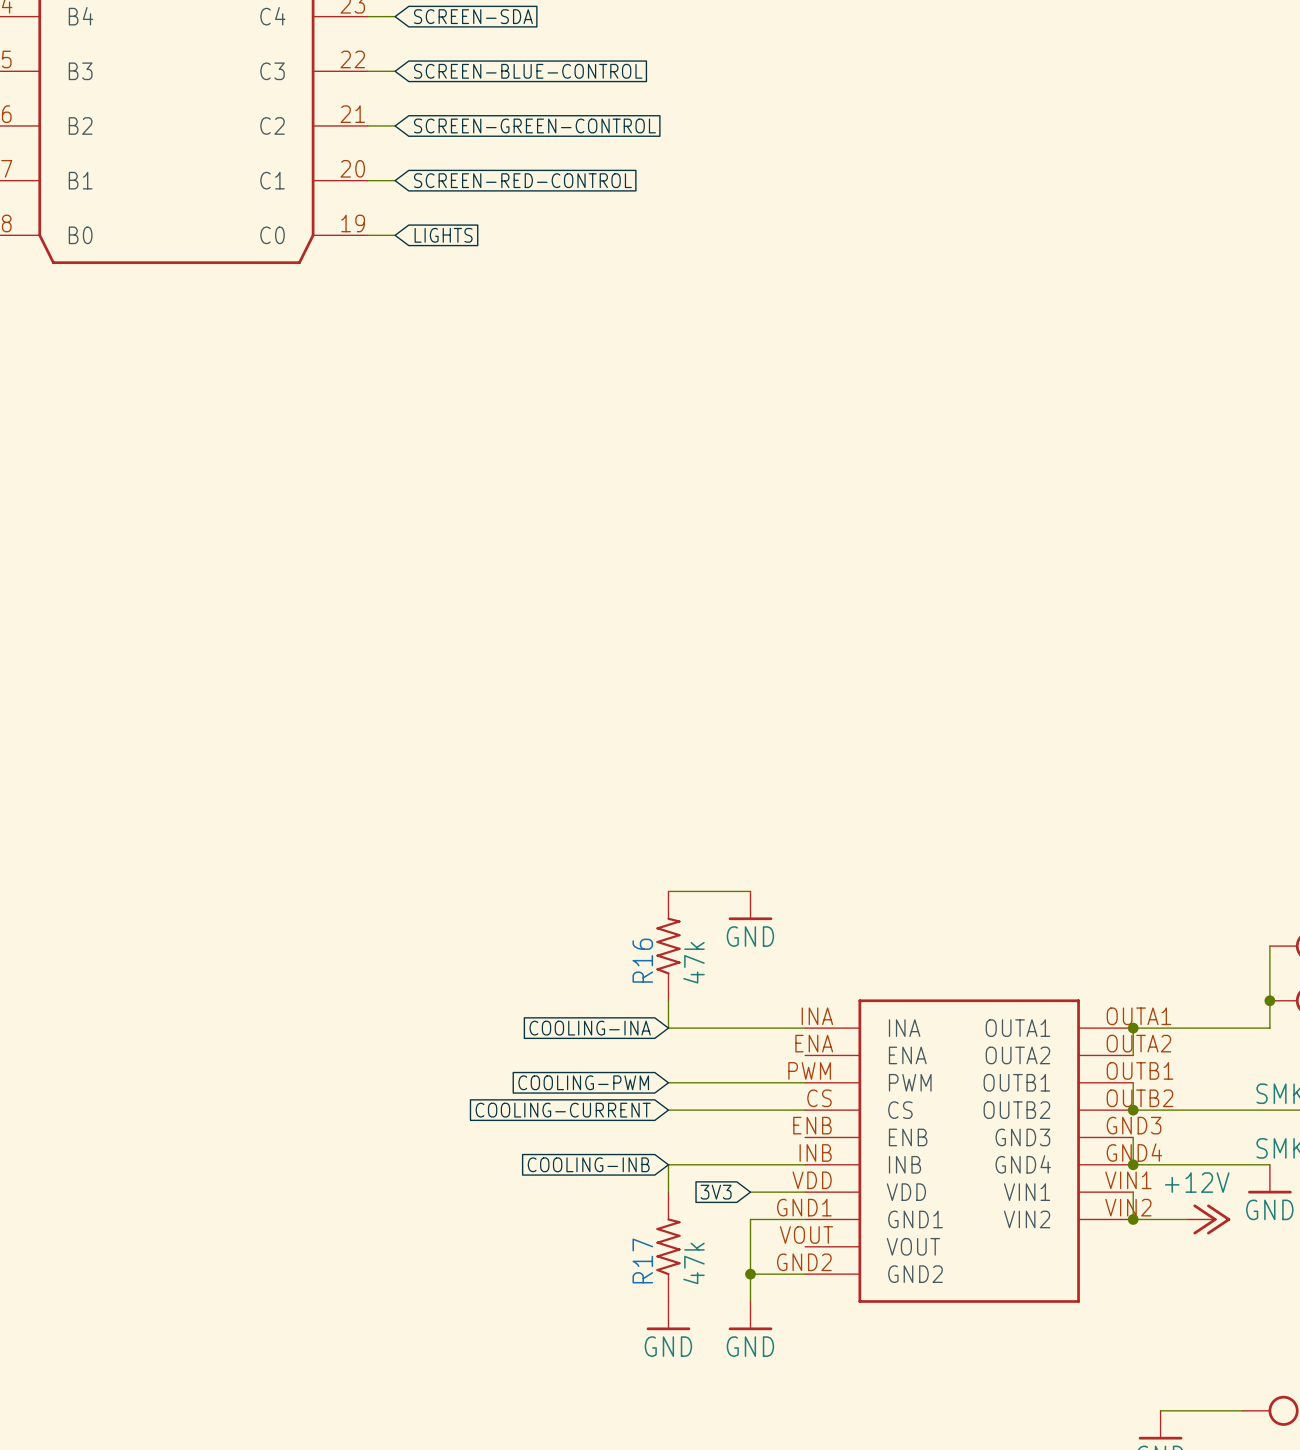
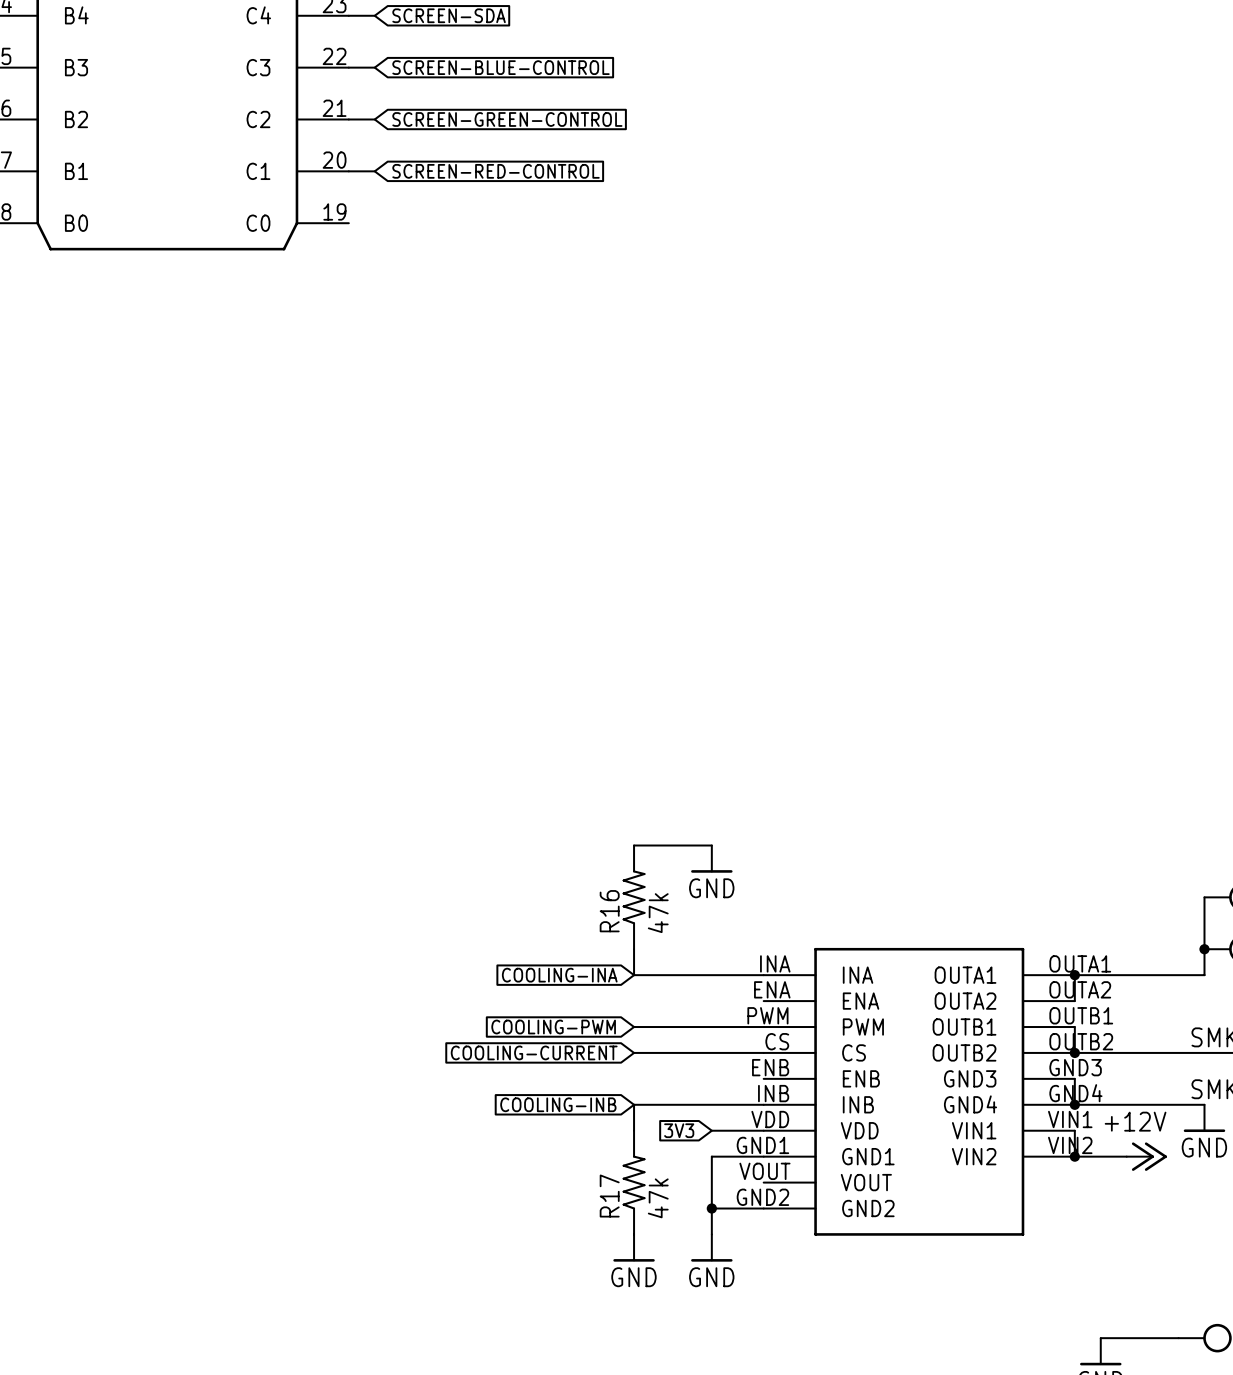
wire: (367, 235) (395, 235) -> none
global label: LIGHTS (443, 235) -> none

